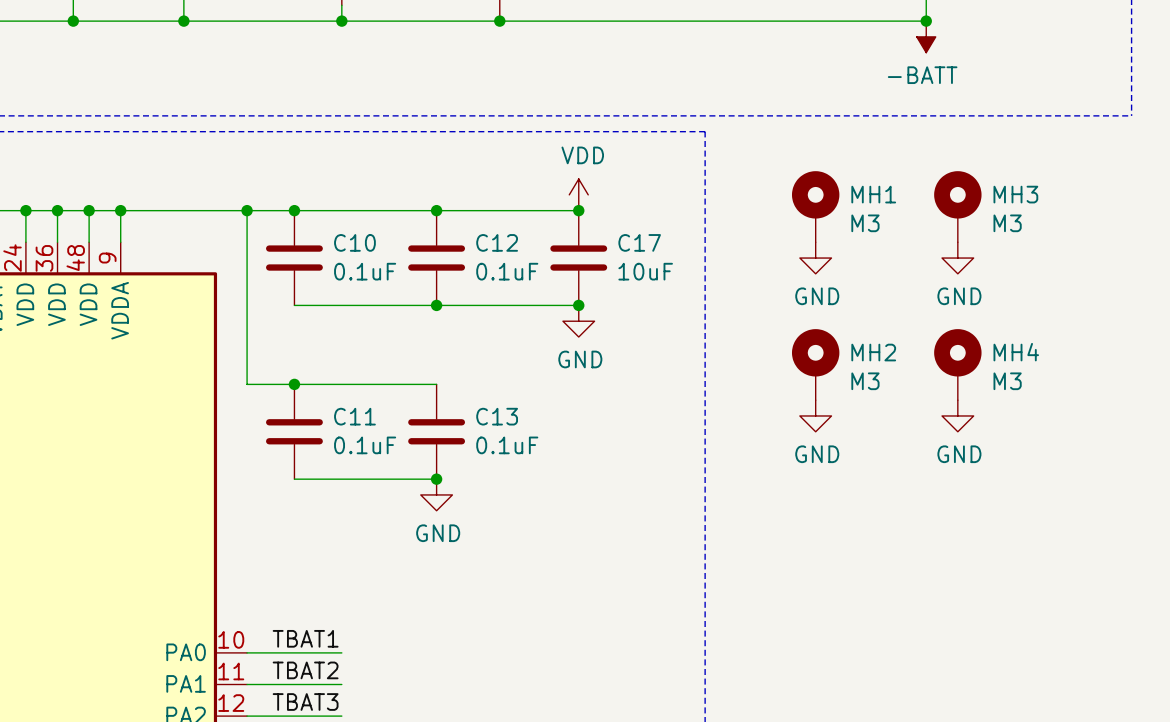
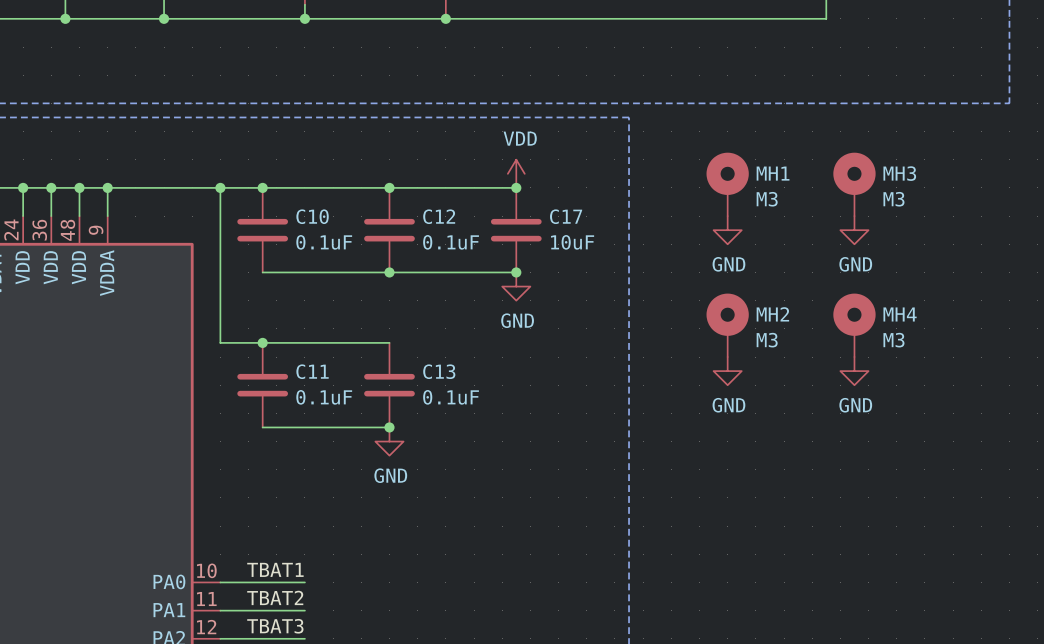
junction: (926, 21) -> none
power symbol: -BATT (926, 36) -> none

